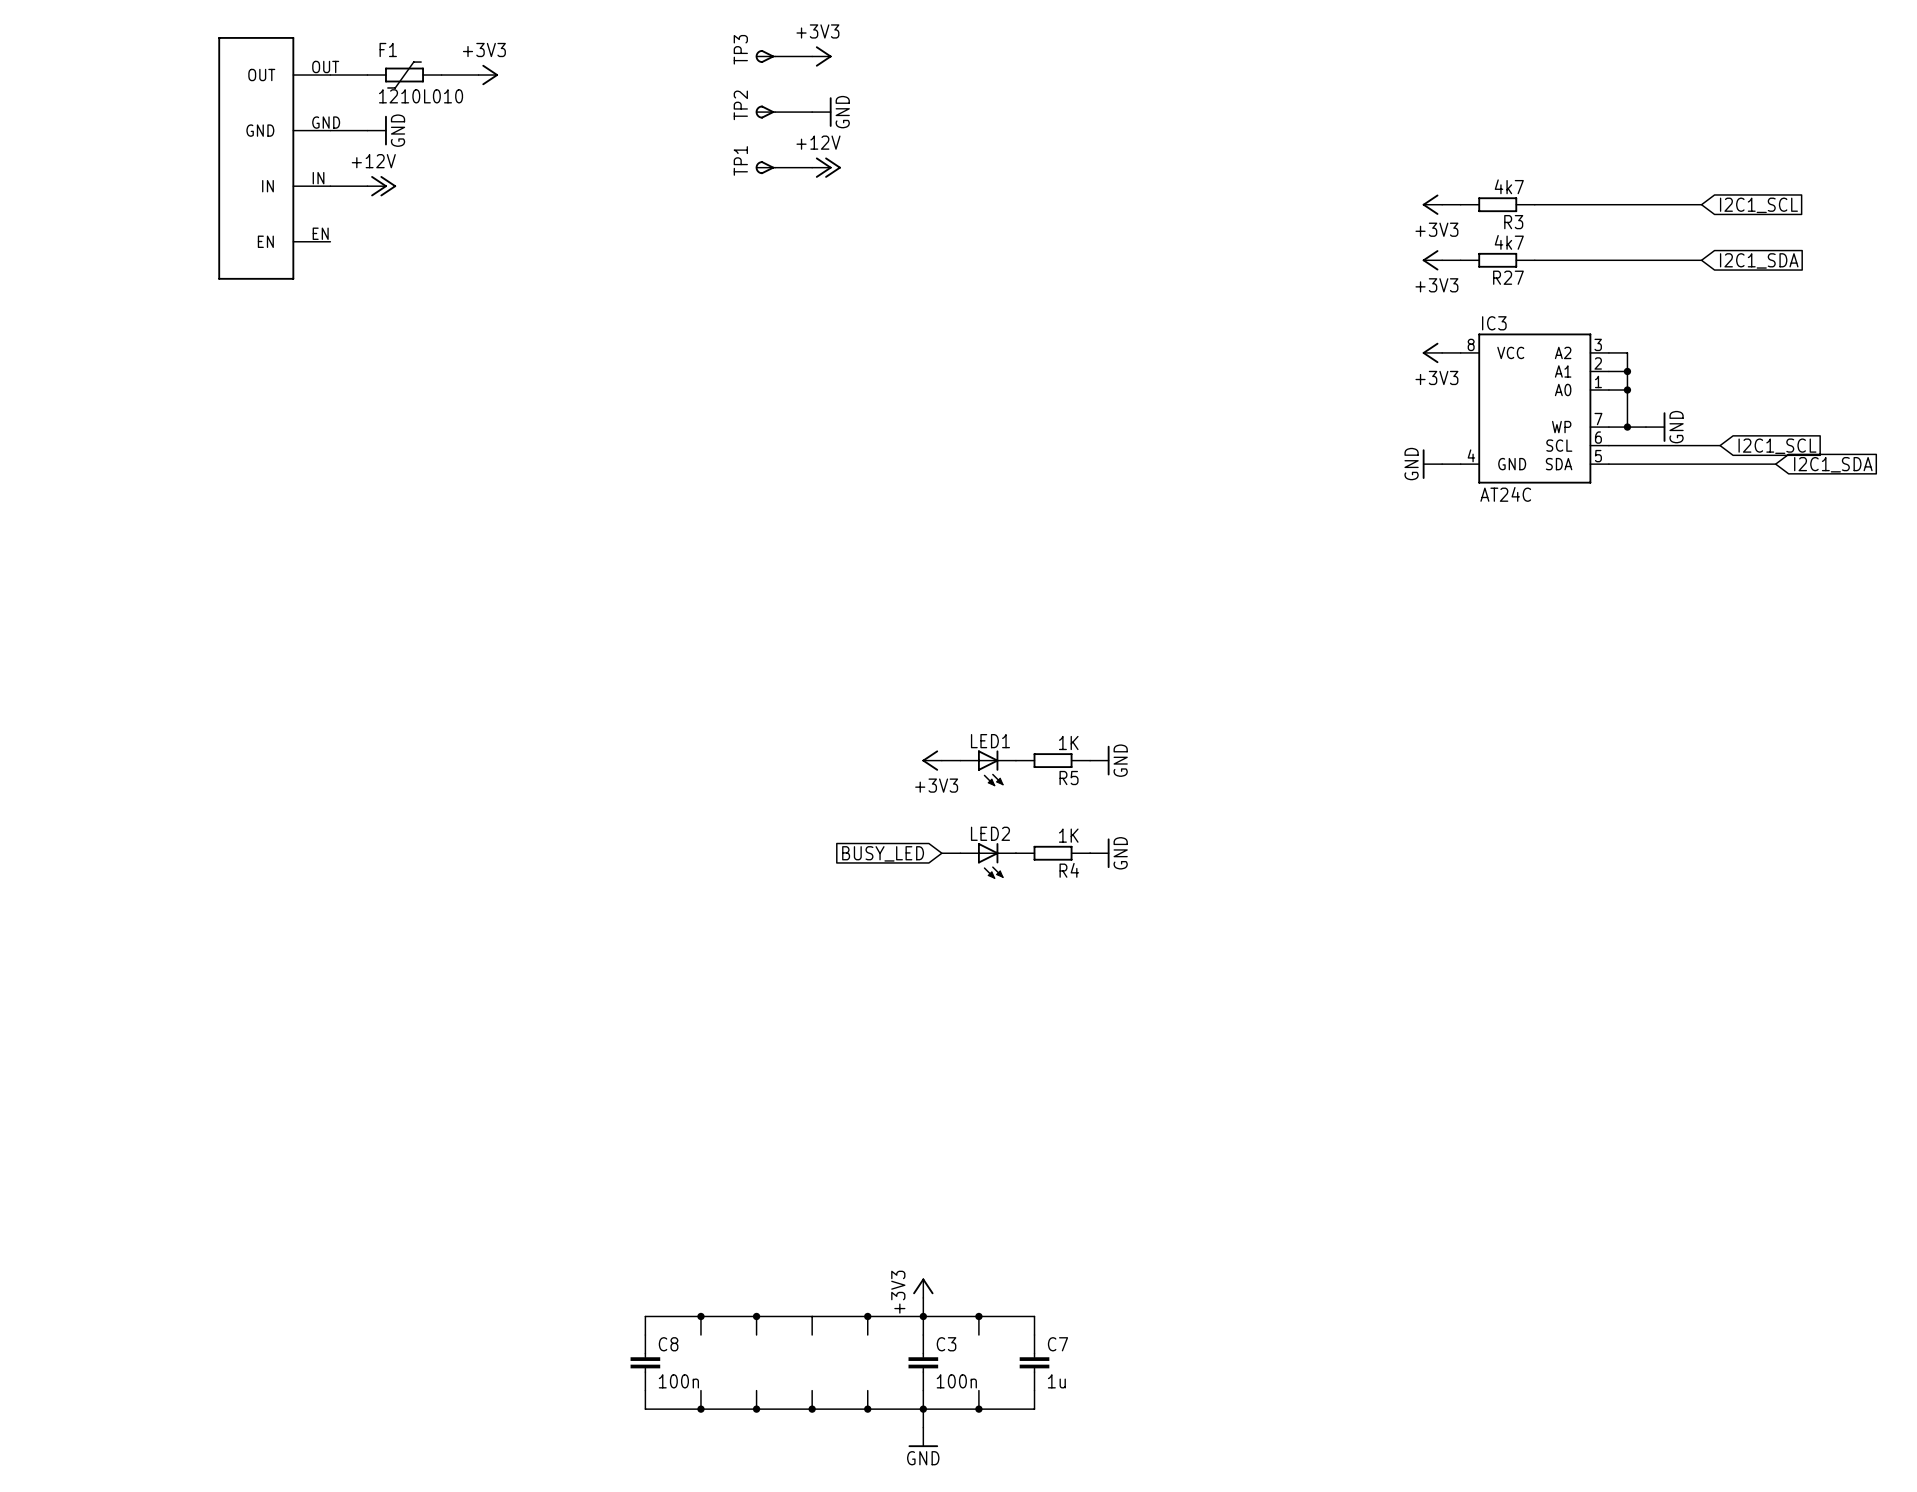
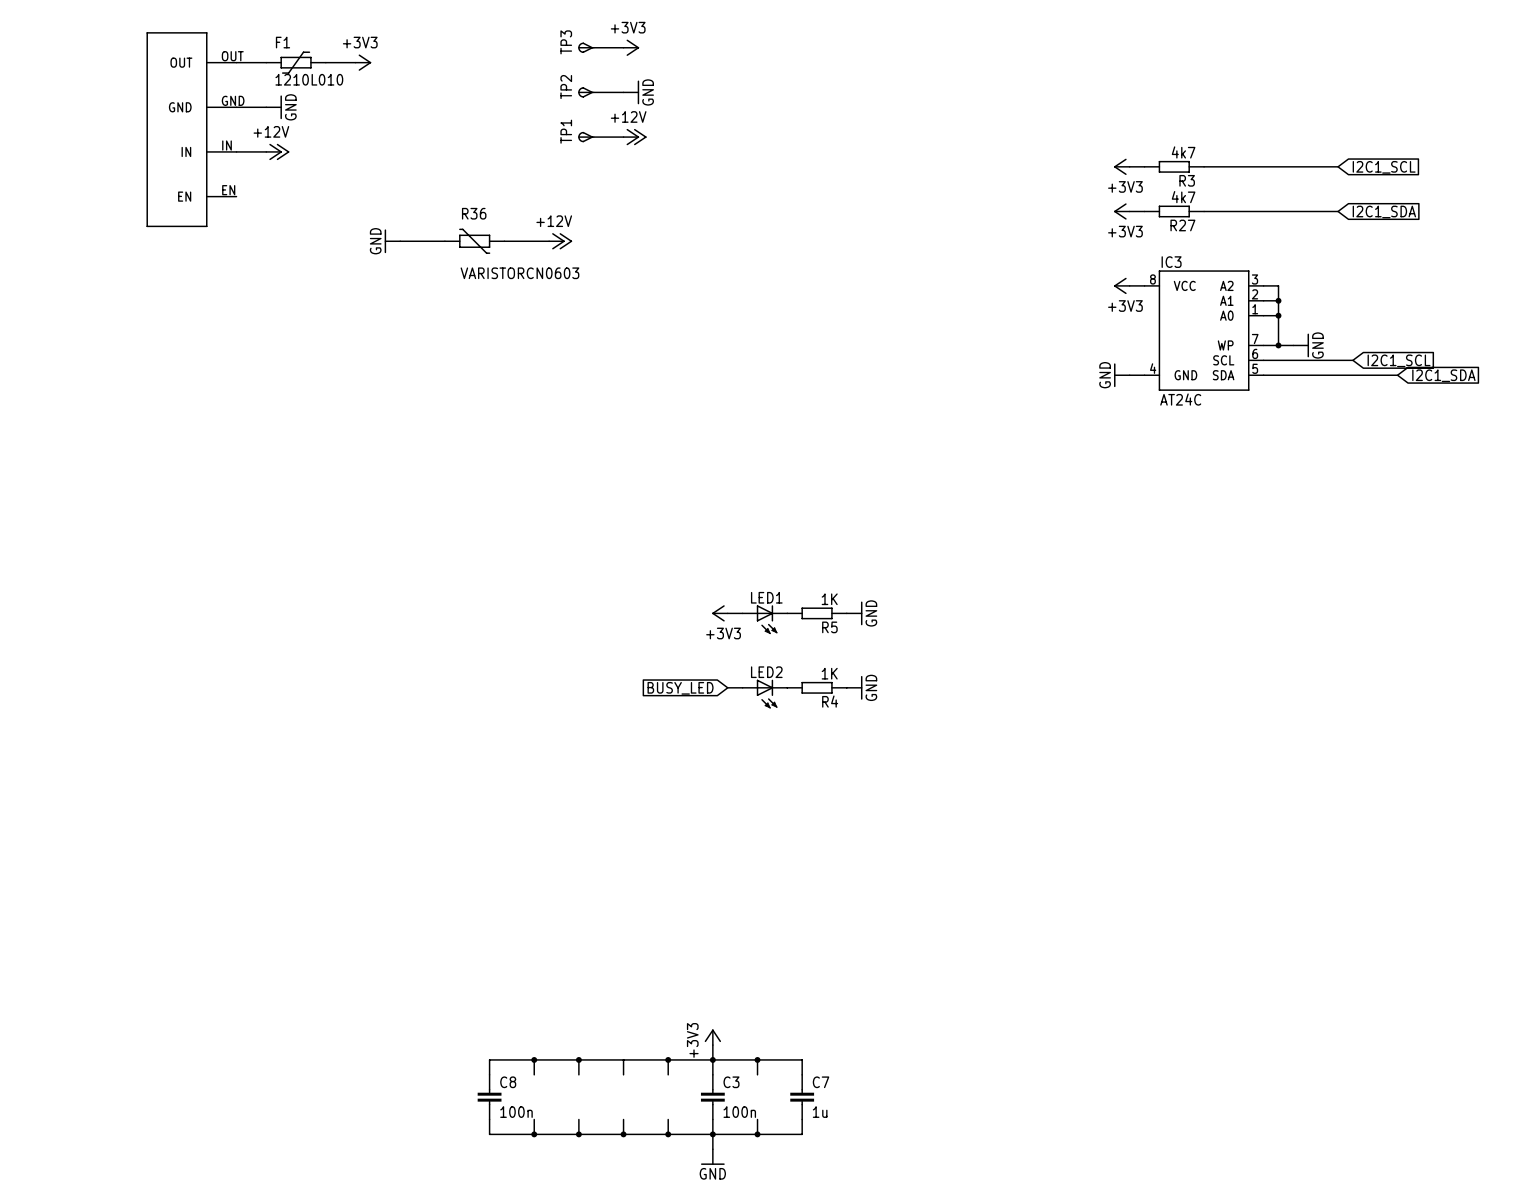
power symbol: none -> GND (392, 241)
wire: none -> (400, 241) (444, 241)
R36: none -> VARISTORCN0603 (474, 241)
wire: none -> (504, 241) (549, 241)
power symbol: none -> +12V (560, 241)

